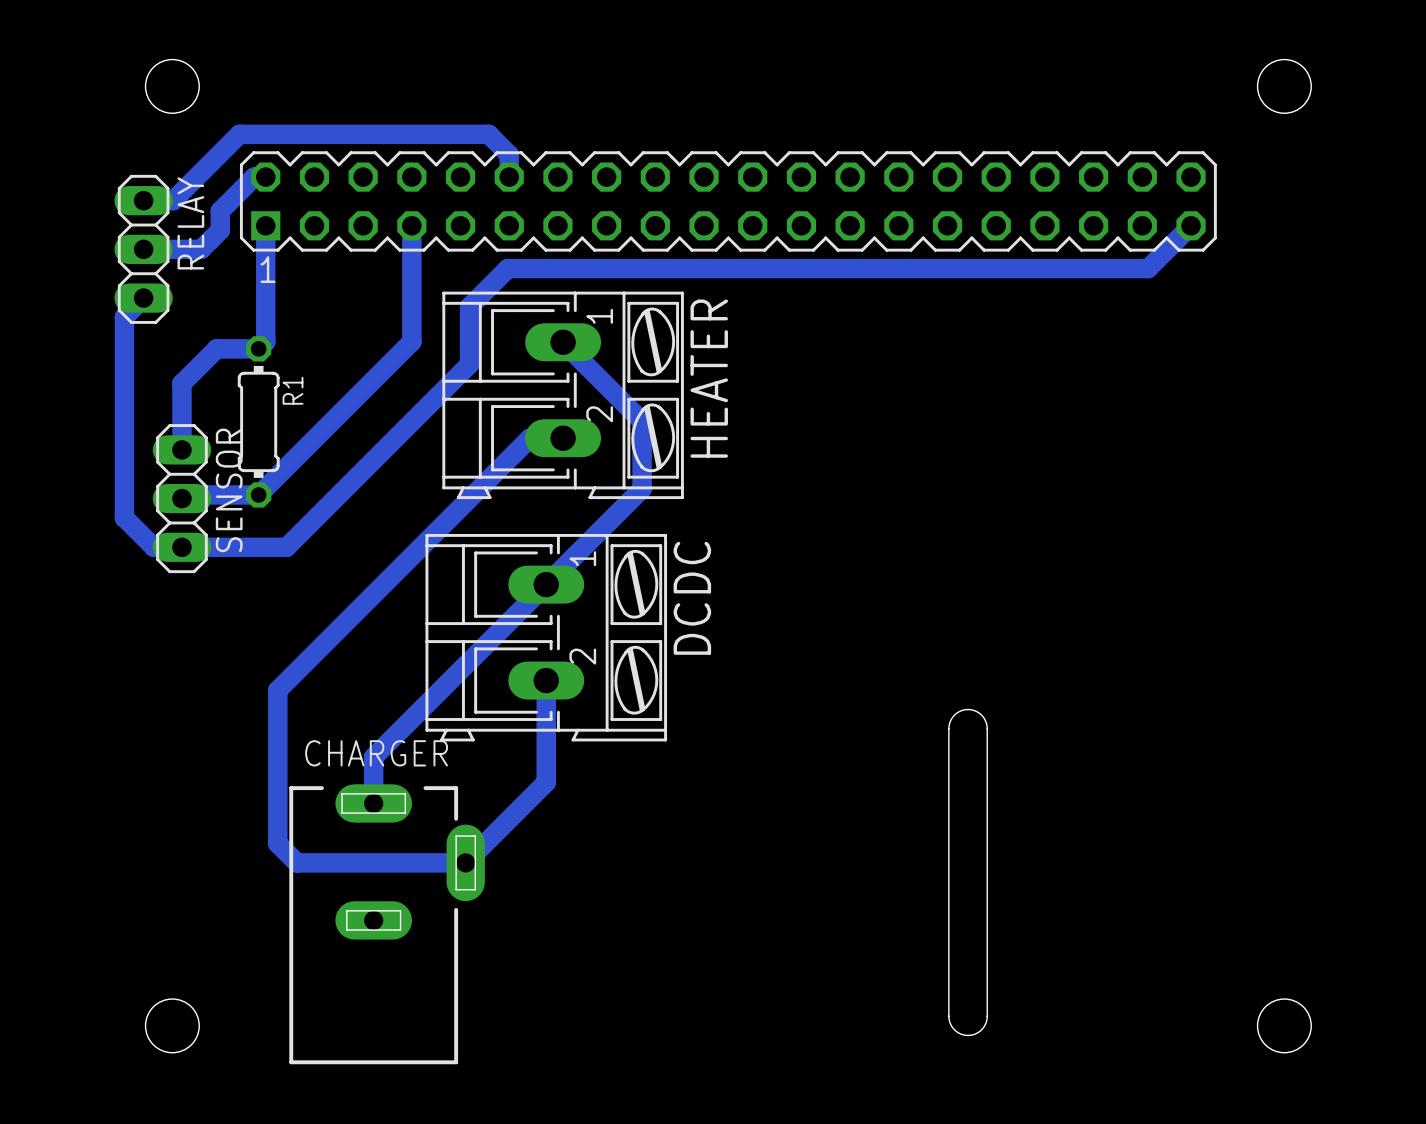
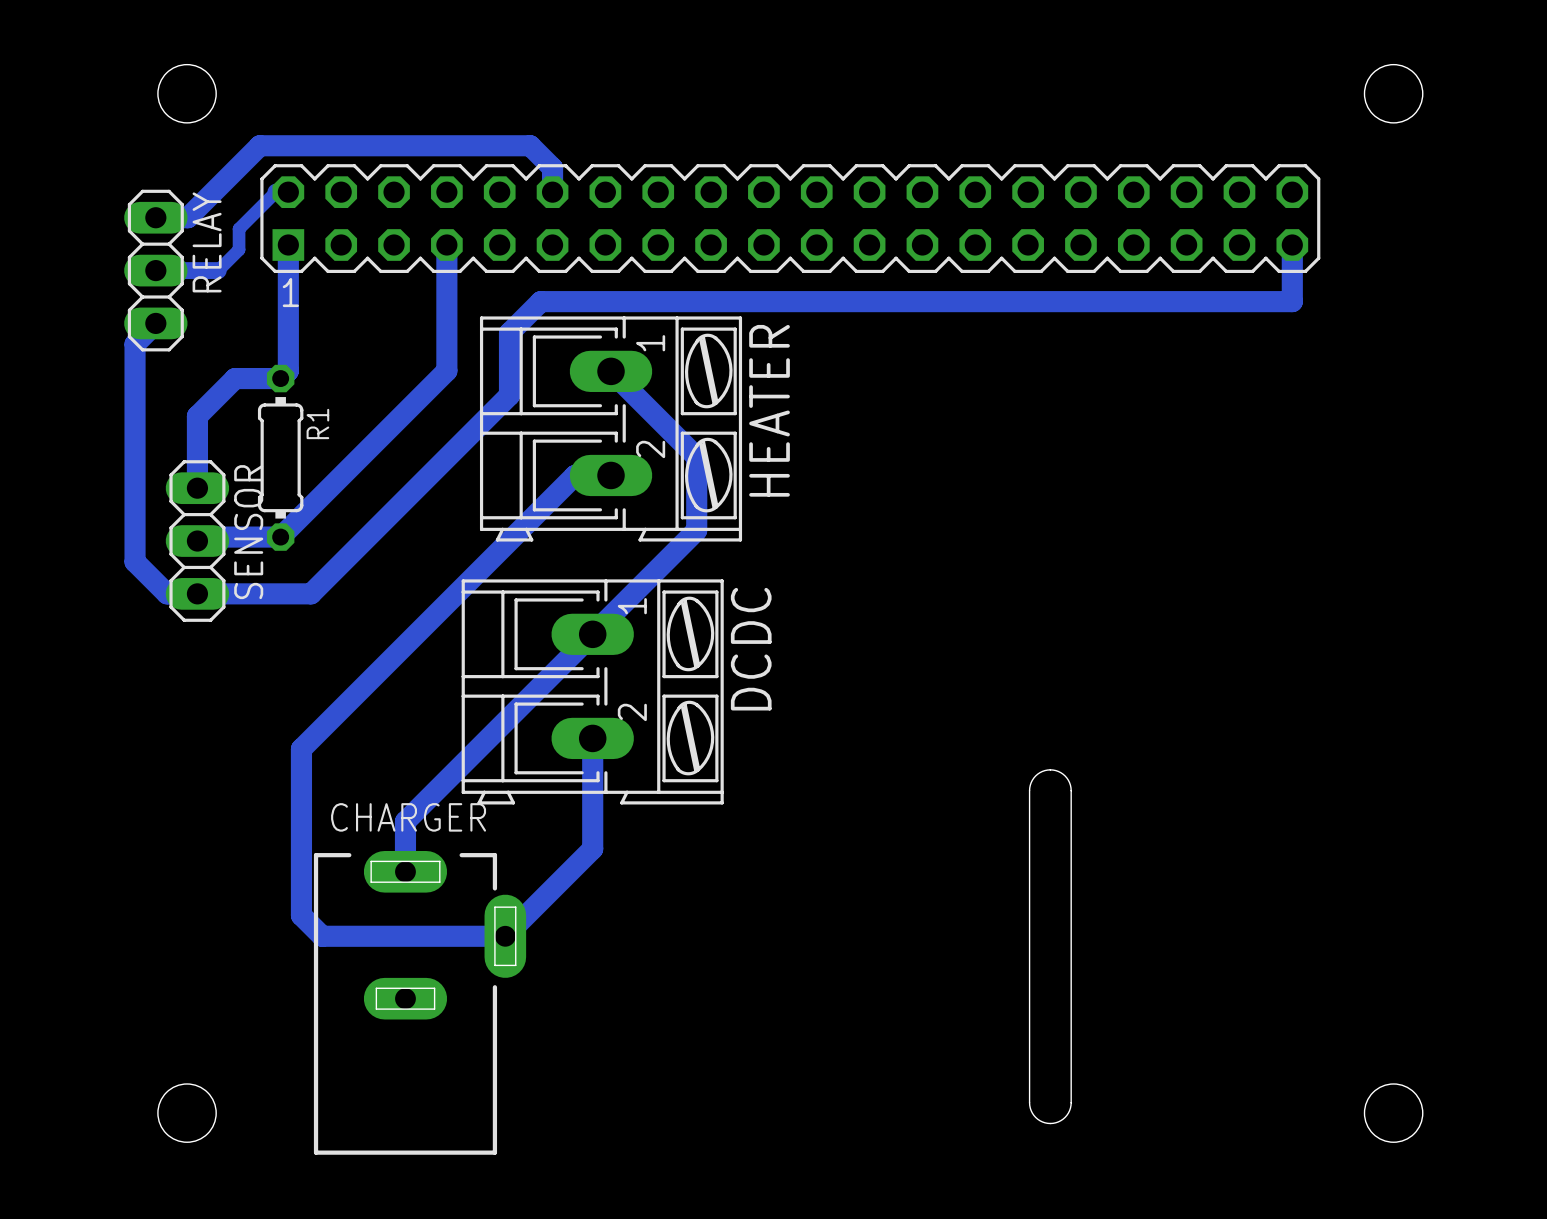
bottom track width: thick (265, 177) (254, 177) (220, 211) (220, 230) (201, 249) (143, 249) -> thin (288, 192) (275, 192) (239, 228) (239, 249) (218, 270) (155, 270)
bottom track: (1191, 225) (1148, 268) (507, 268) (498, 277) -> (1292, 244) (1292, 301) (540, 301)

